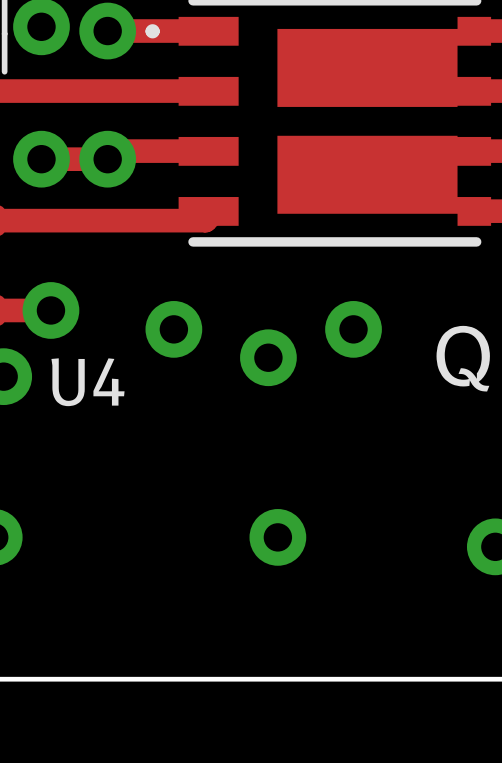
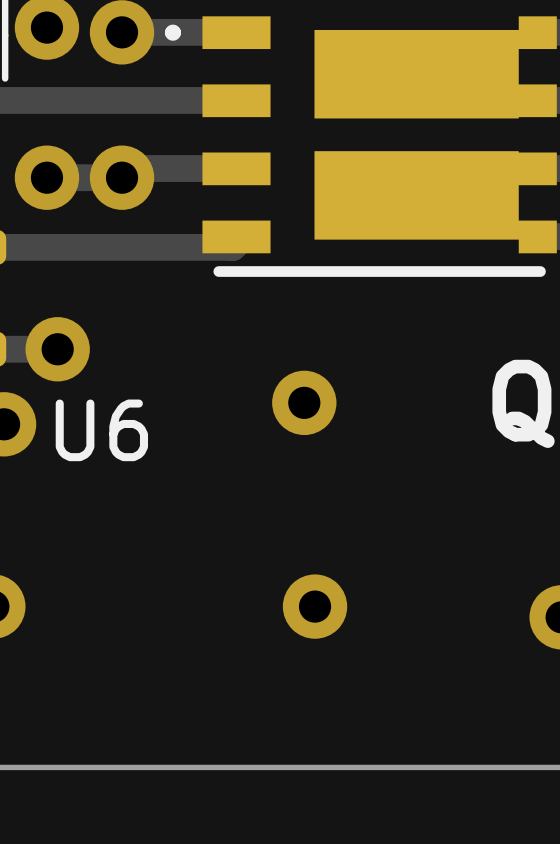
via: (173, 329) -> none
via: (353, 329) -> none
U4 name: U4 (88, 382) -> U6 (101, 430)

